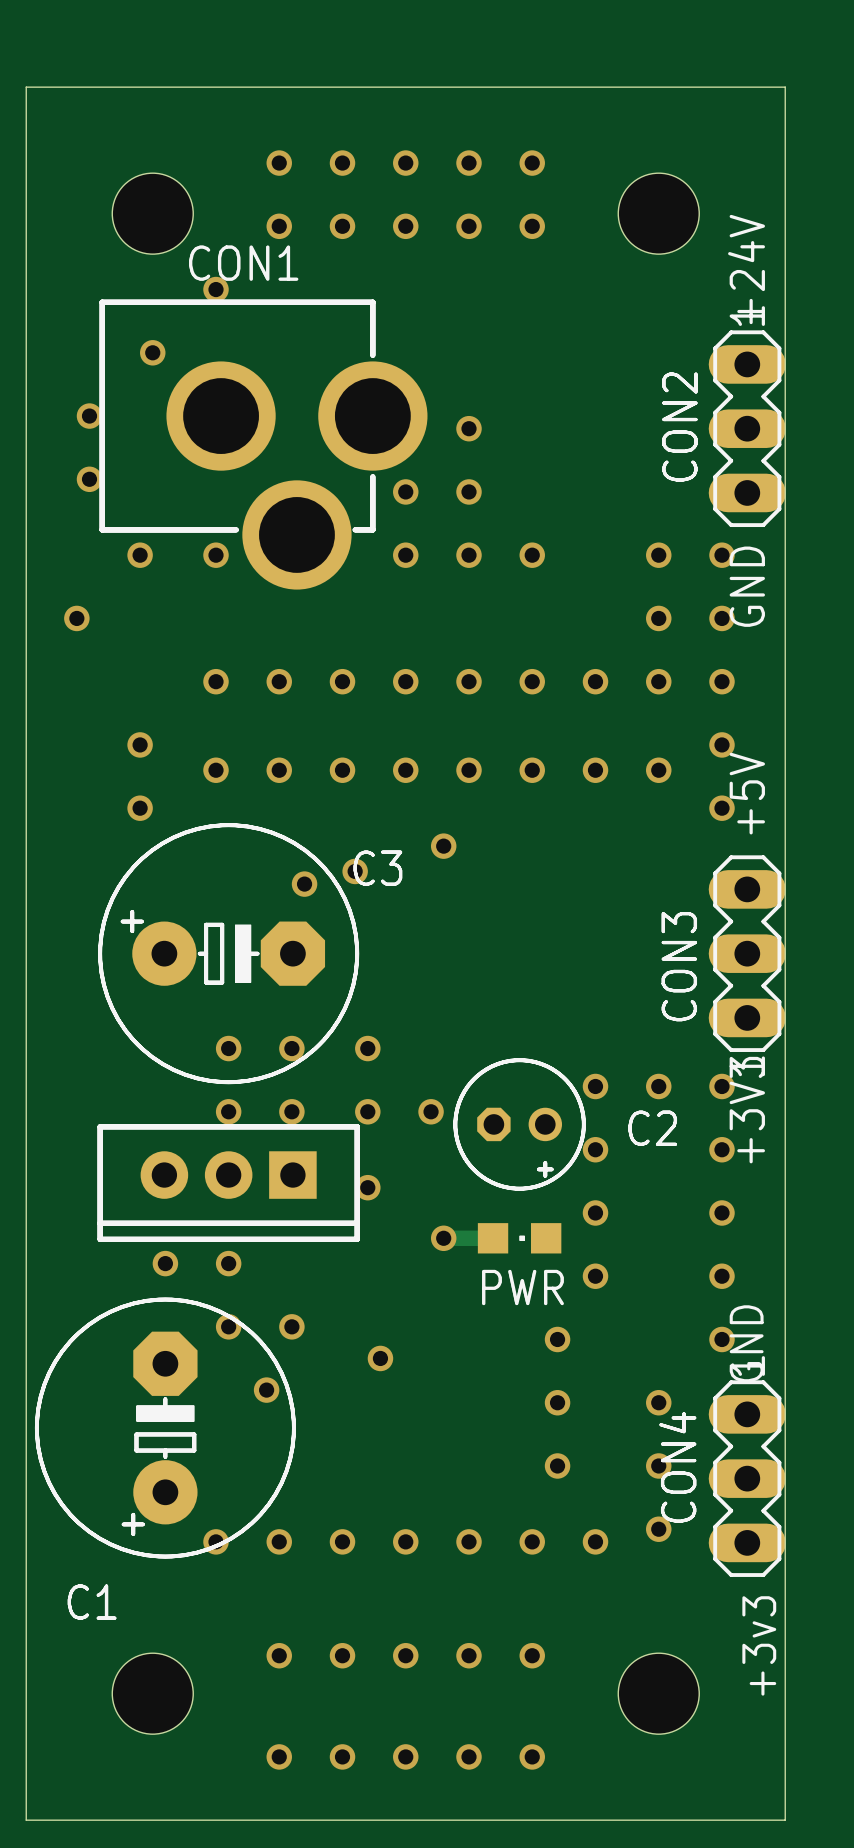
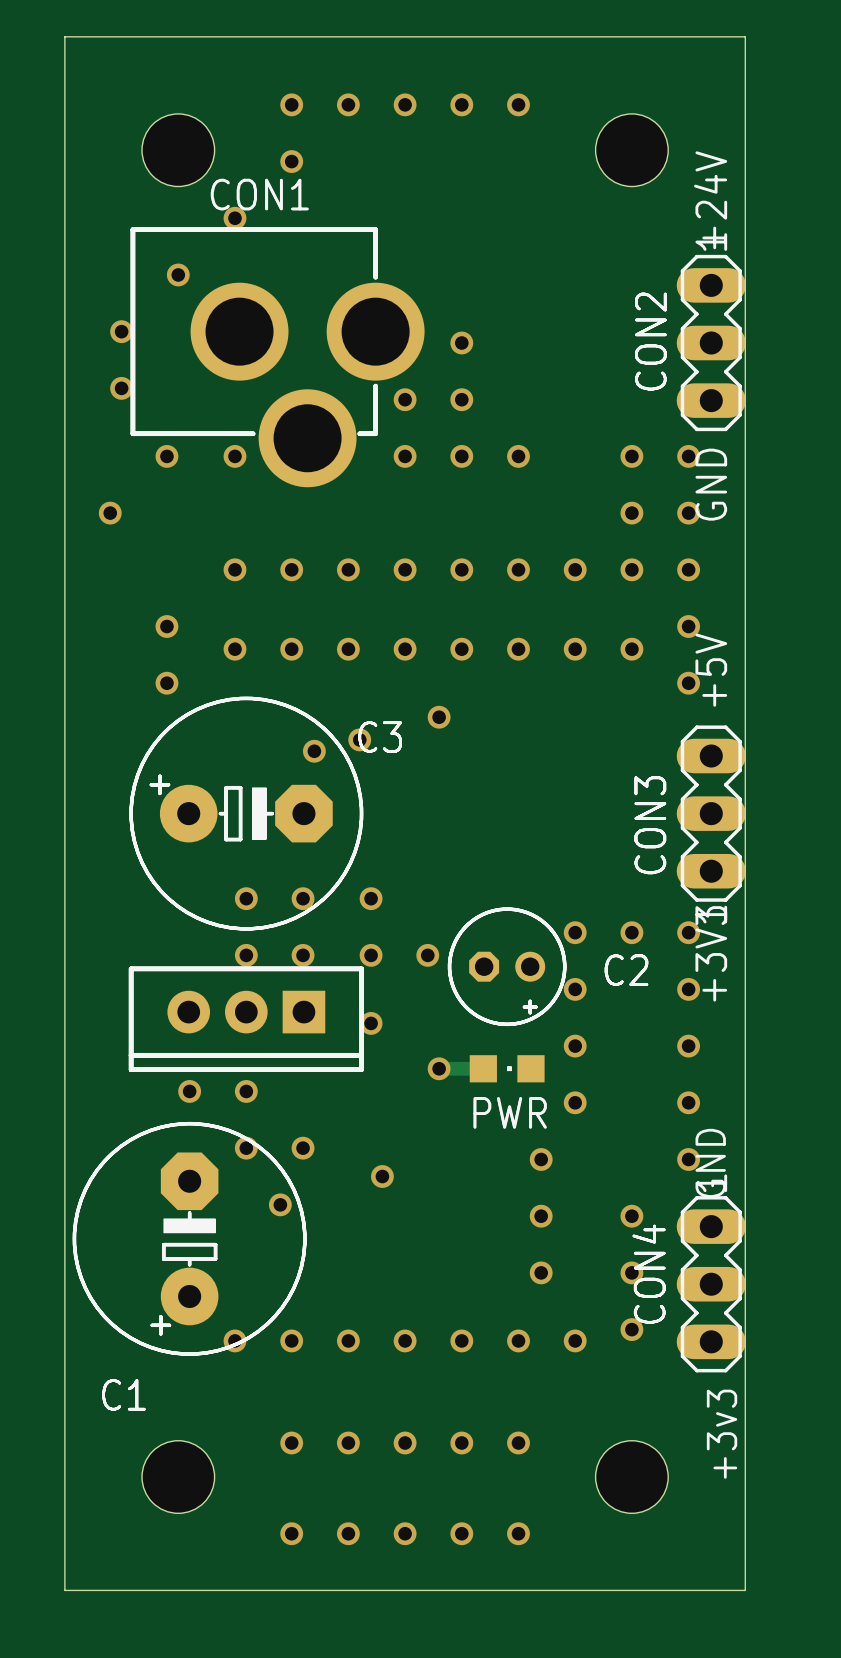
via: (342, 226) -> none
via: (405, 226) -> none
via: (469, 226) -> none
via: (532, 226) -> none

